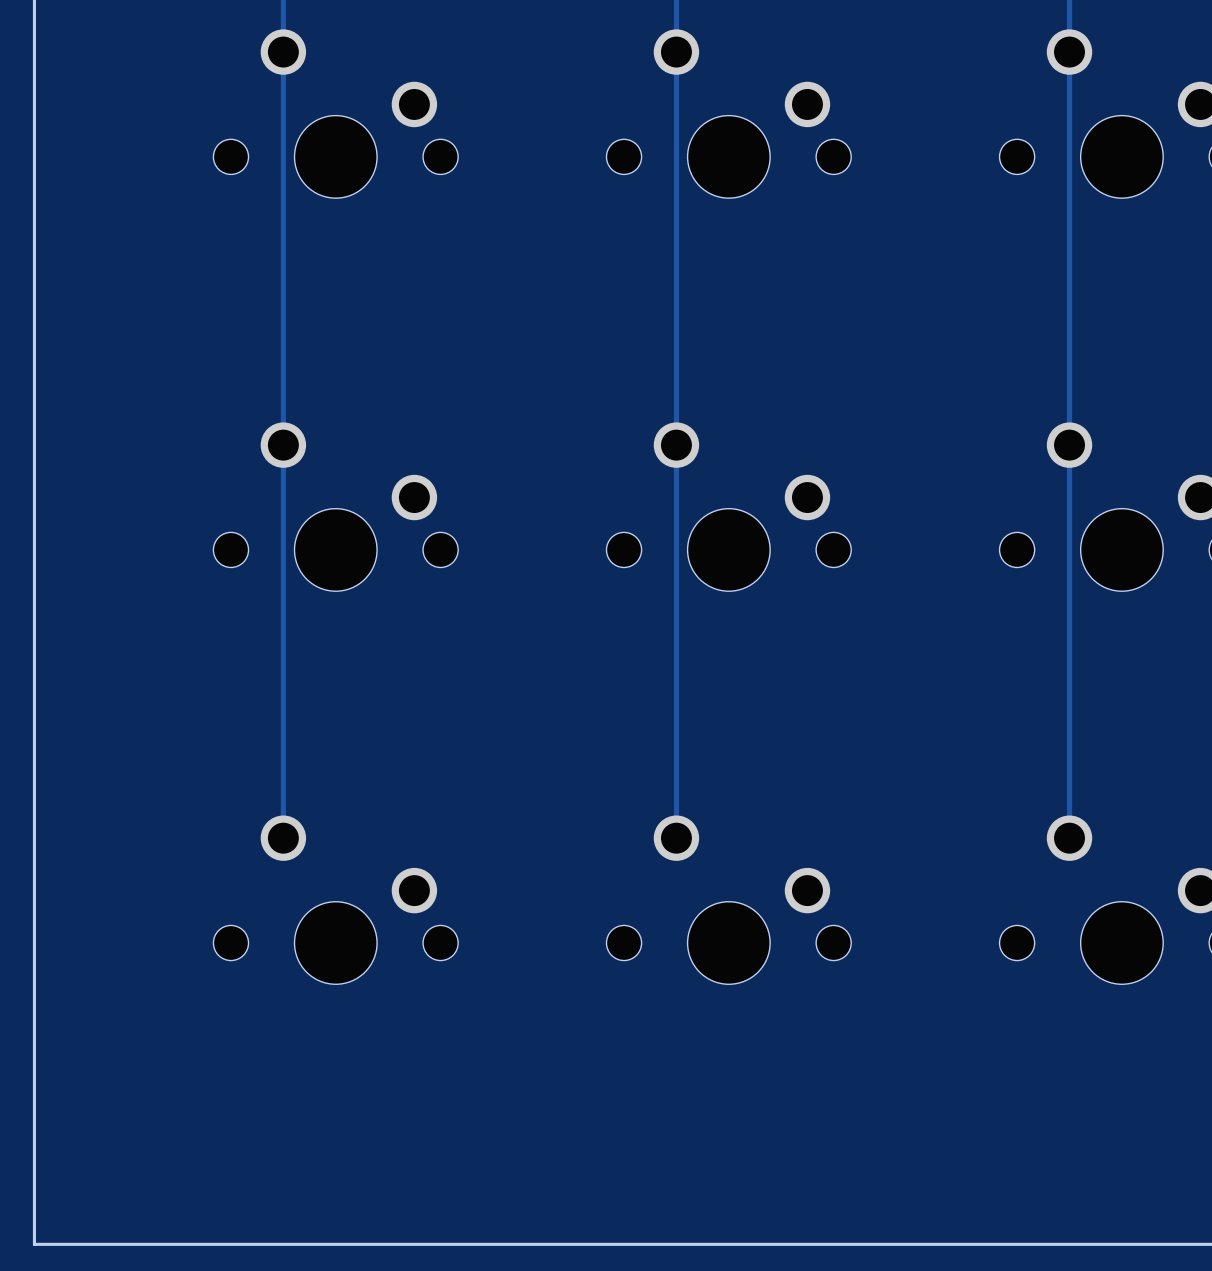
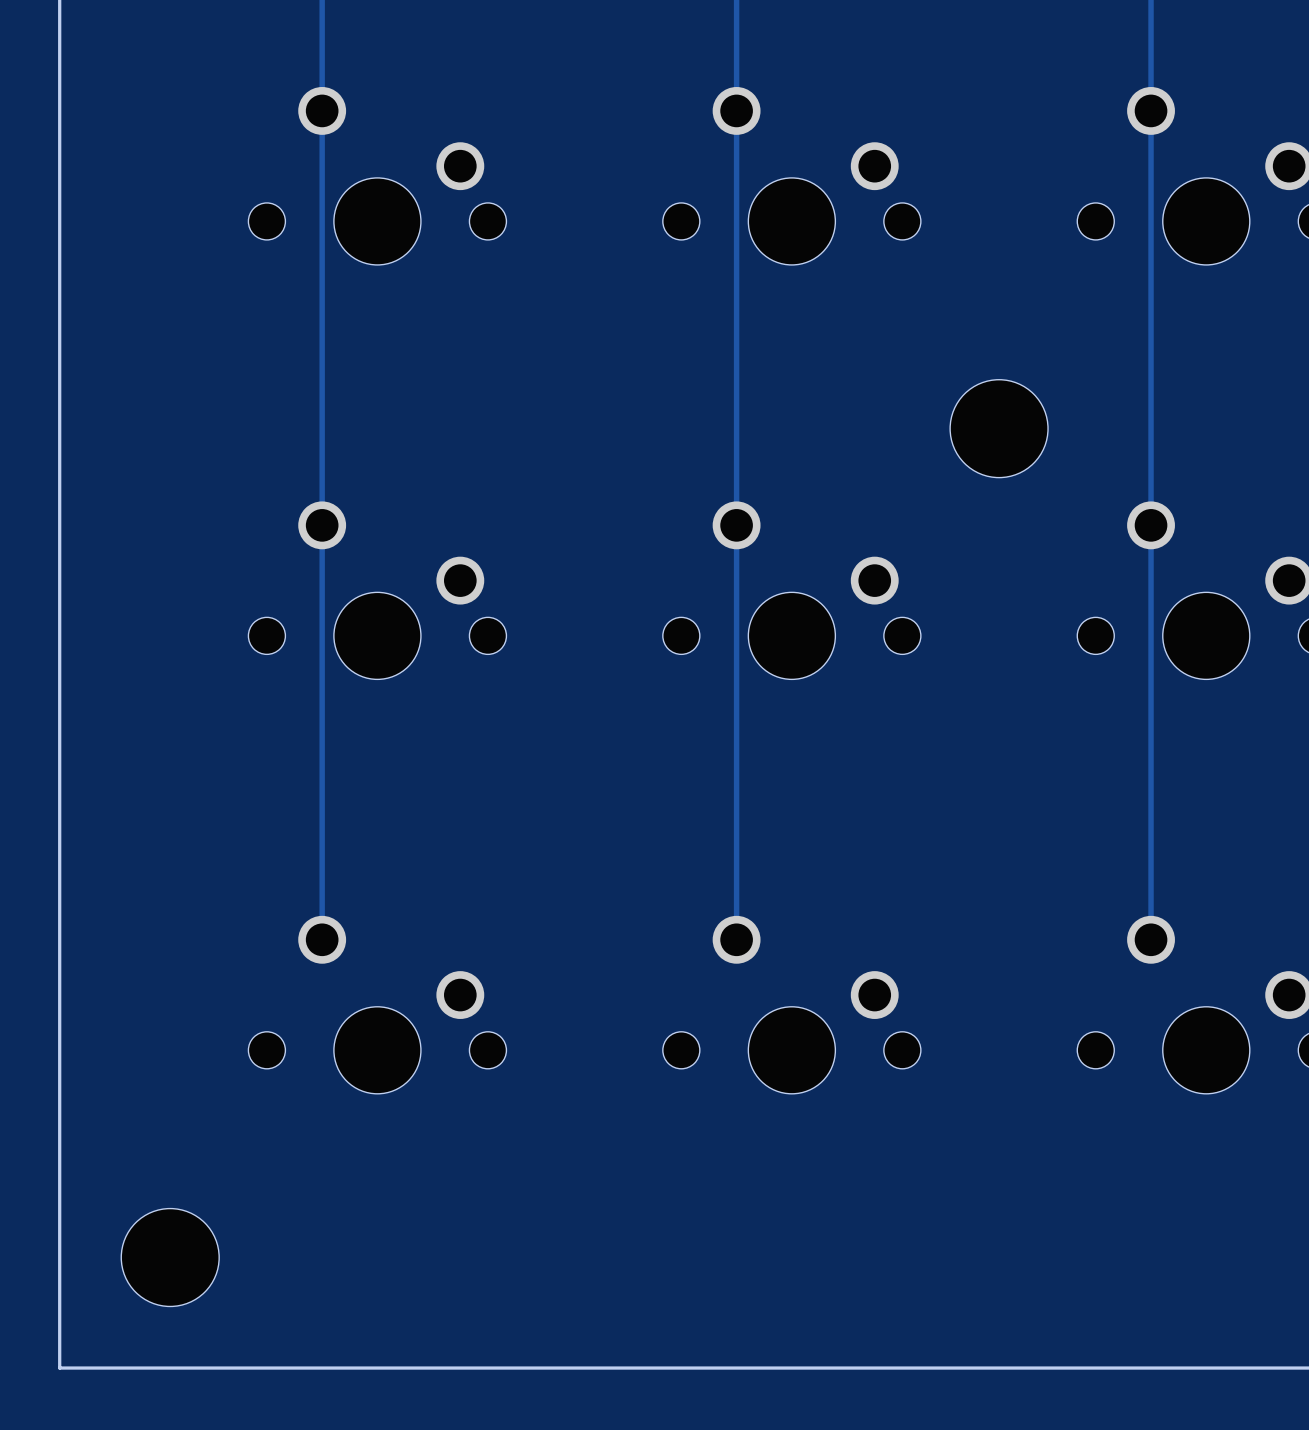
part: none -> (999, 428)
part: none -> (170, 1257)

